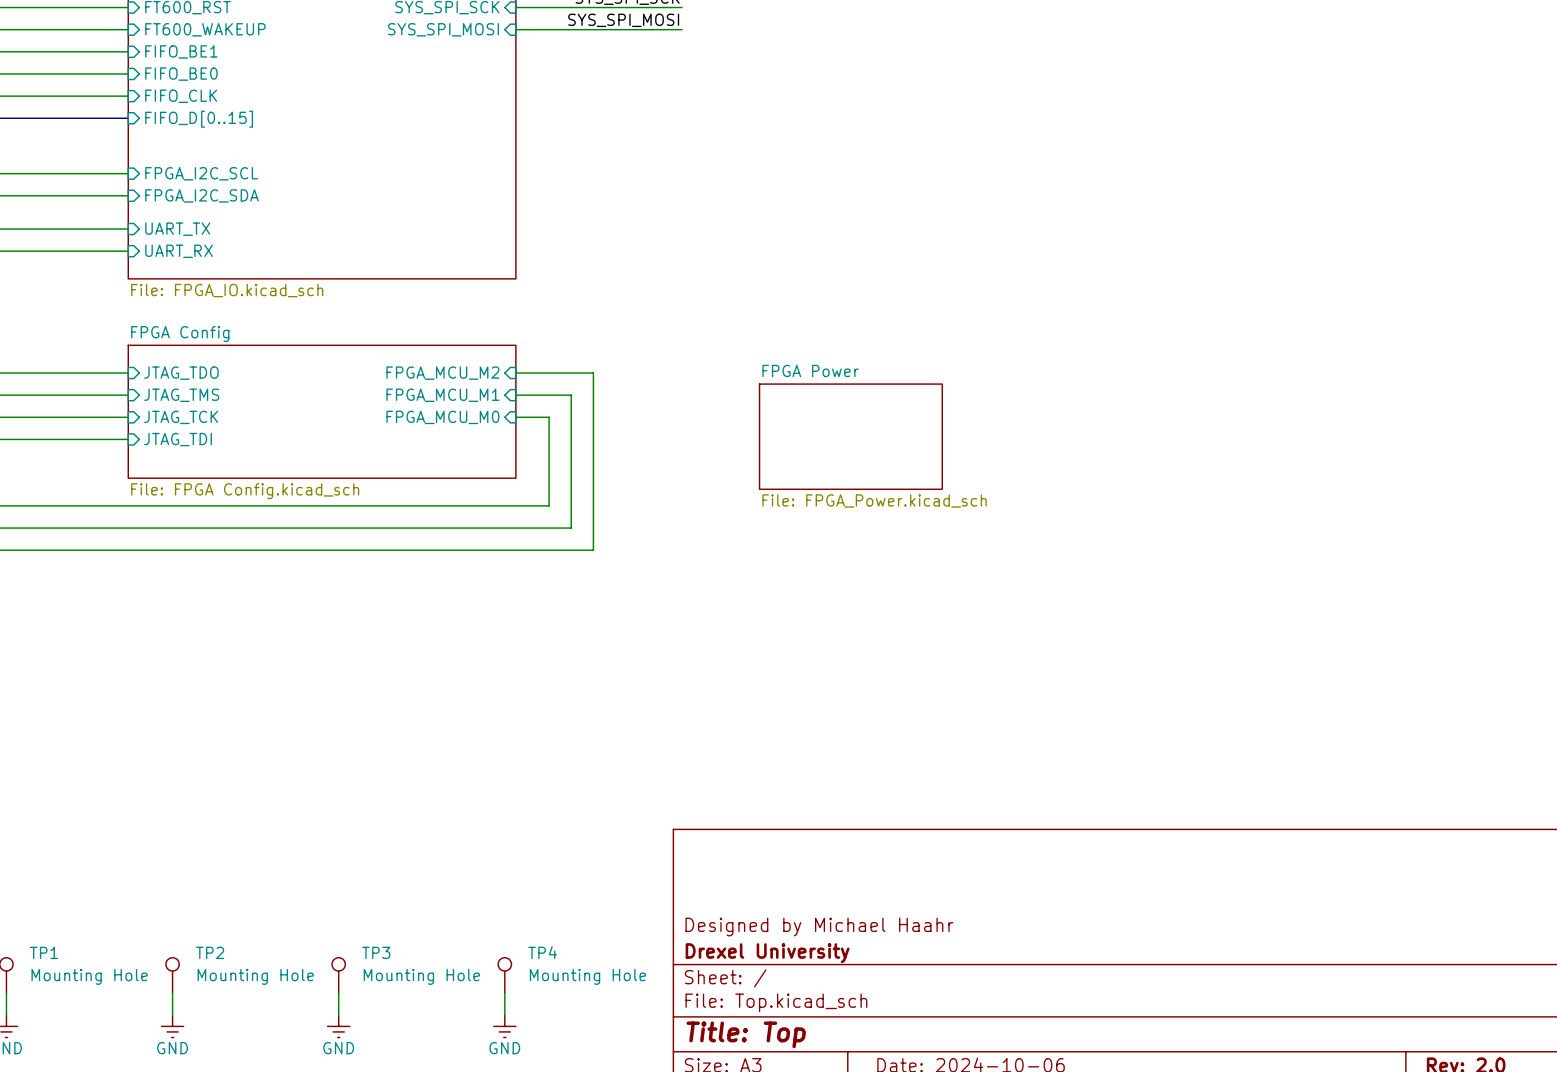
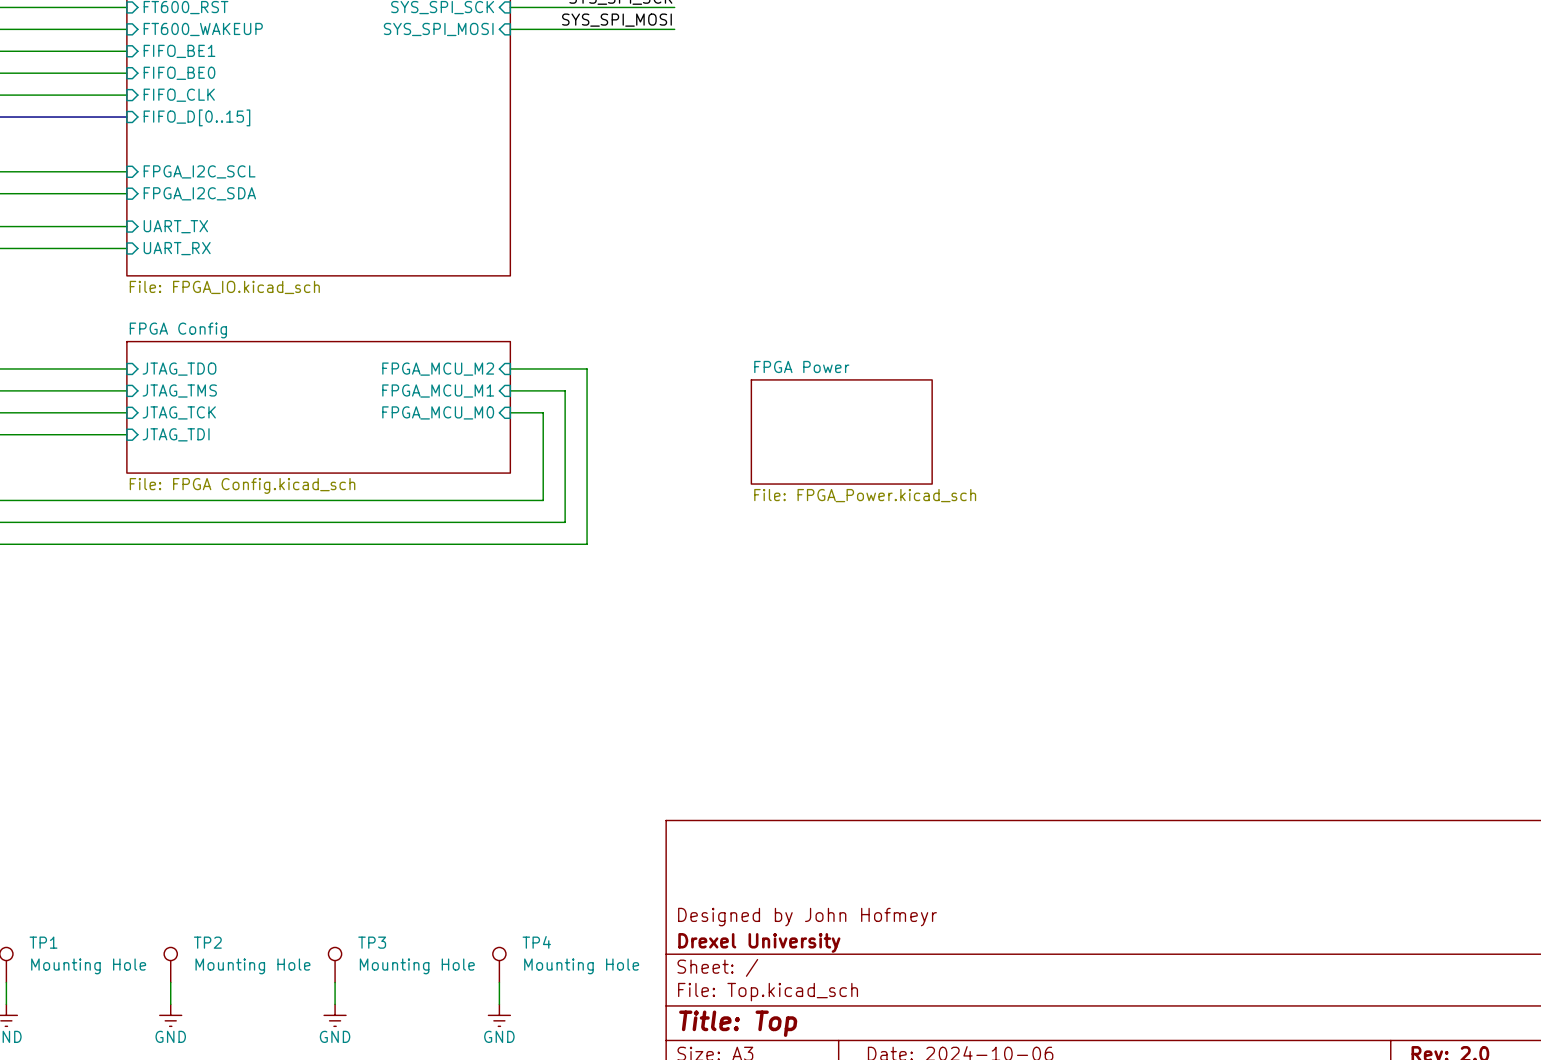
title block: Designed by Michael Haahr (819, 927) -> Designed by John Hofmeyr (807, 917)

